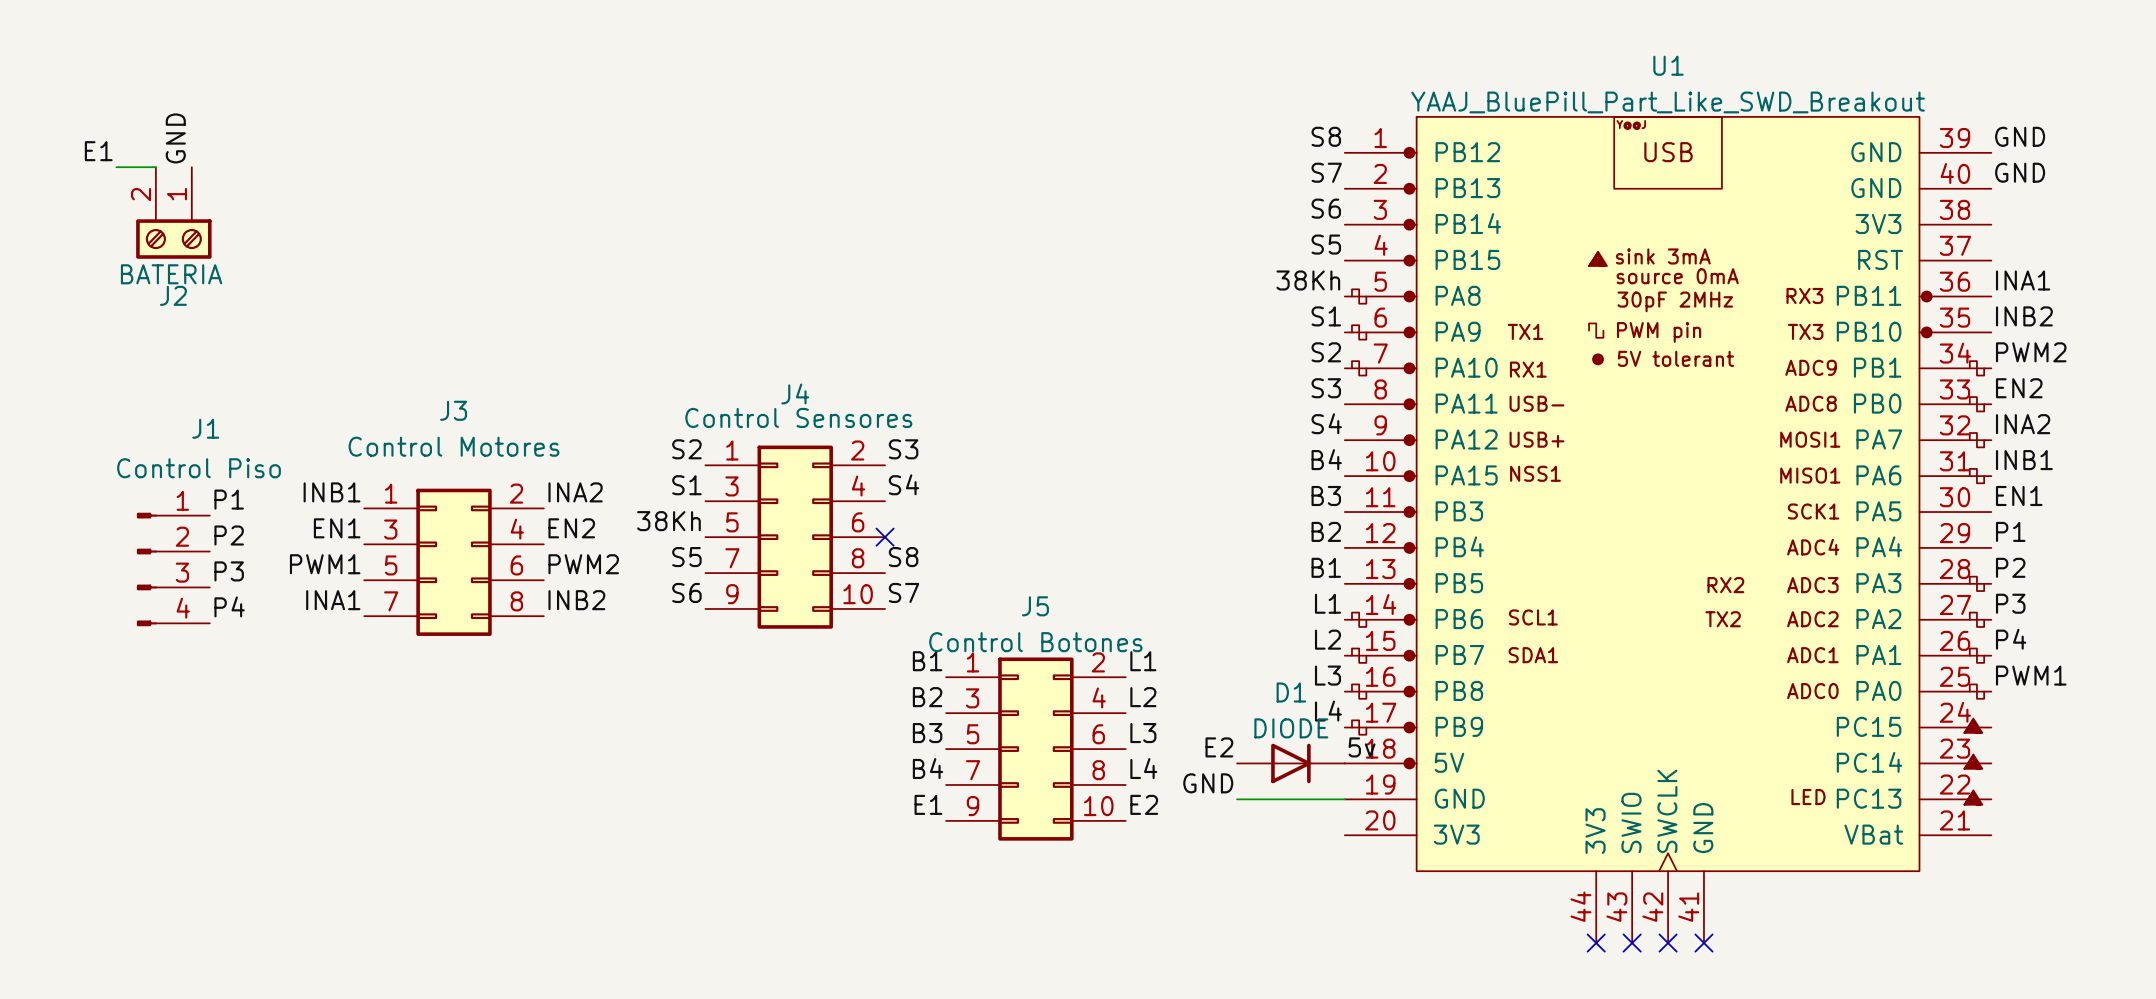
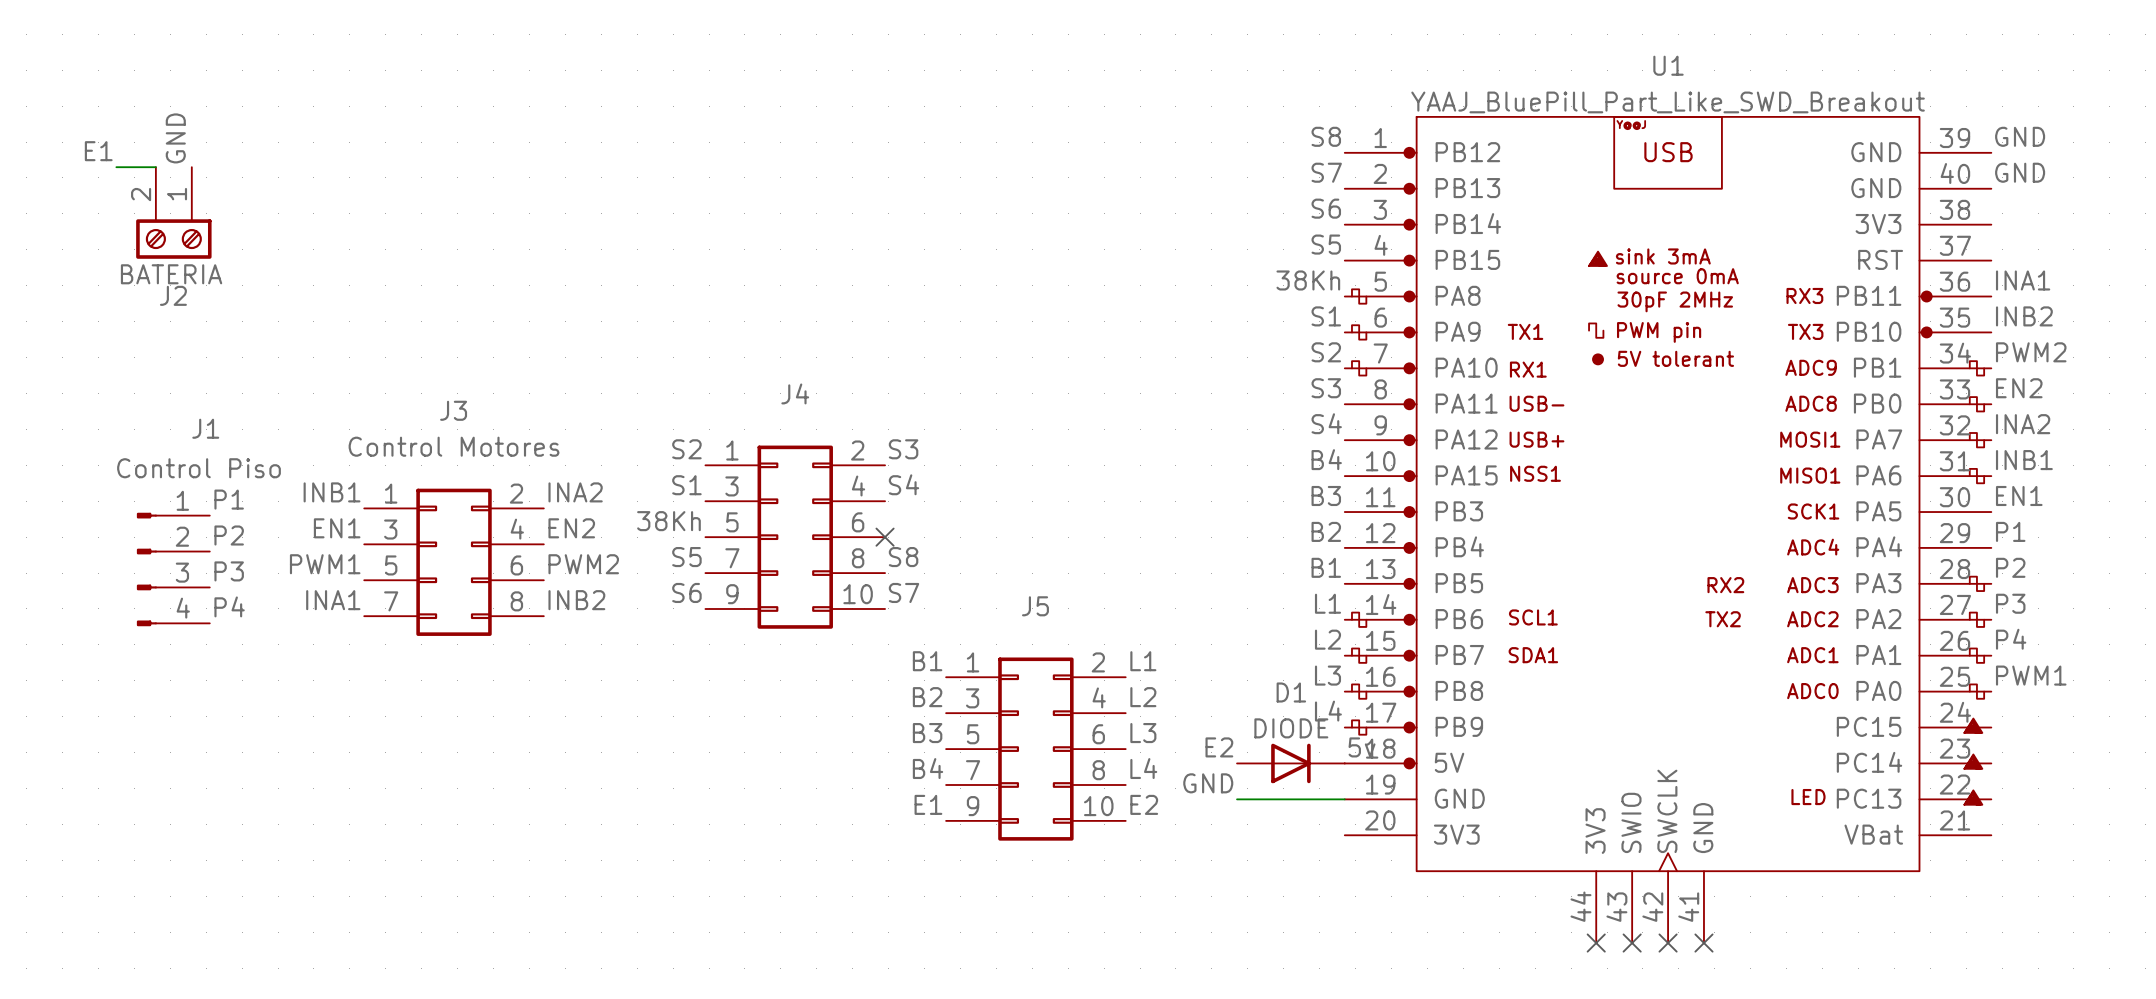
J4 value: Control Sensores (798, 417) -> none
J5 value: Control Botones (1035, 642) -> none

